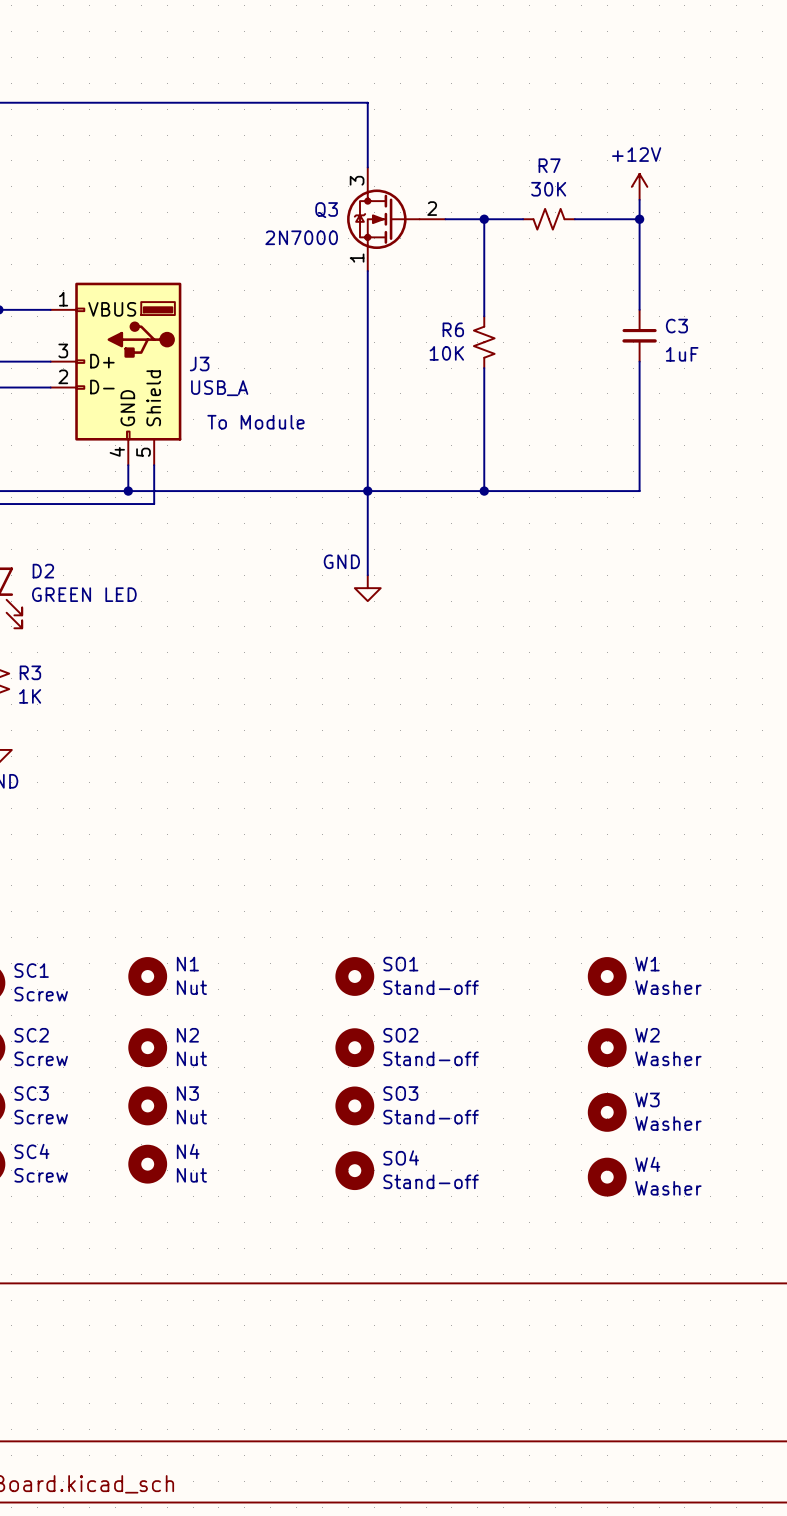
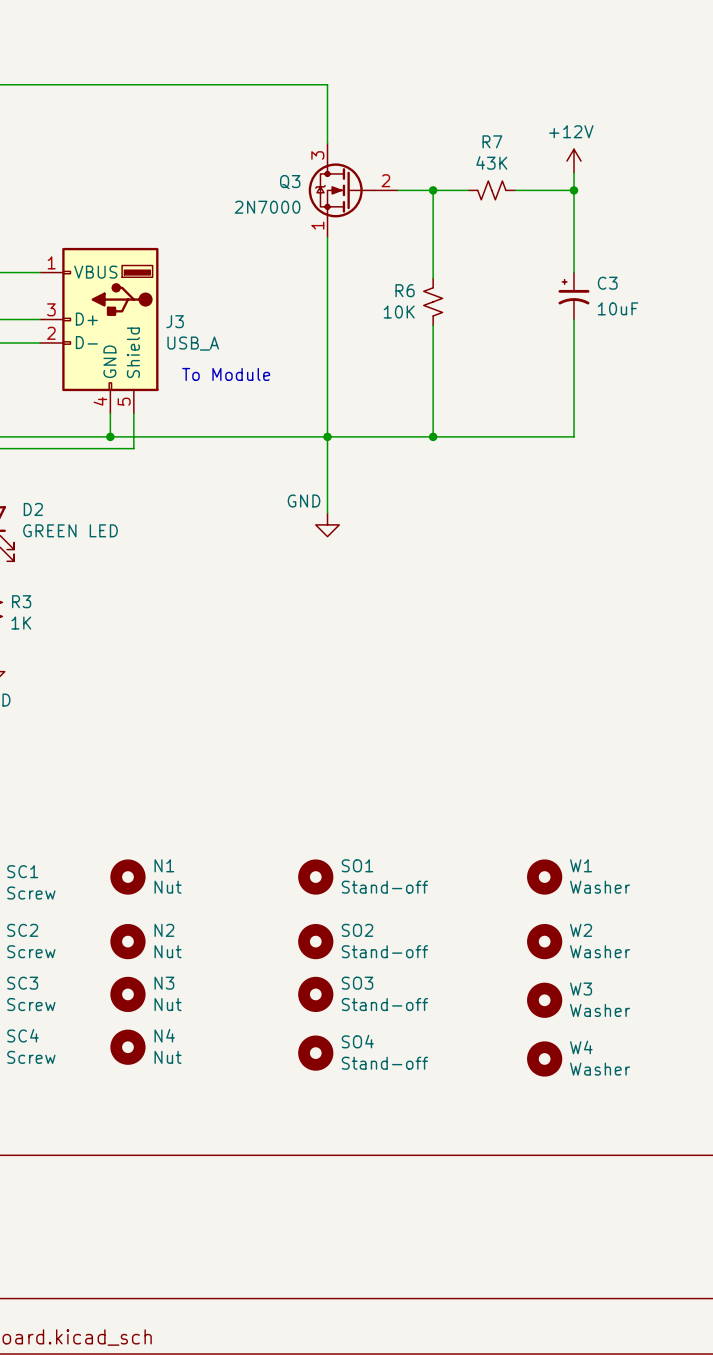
R7 value: 30K (548, 189) -> 43K (491, 162)
C3 symbol: [622, 309, 657, 362] -> [558, 272, 590, 320]
C3 value: 1uF (682, 354) -> 10uF (618, 308)

